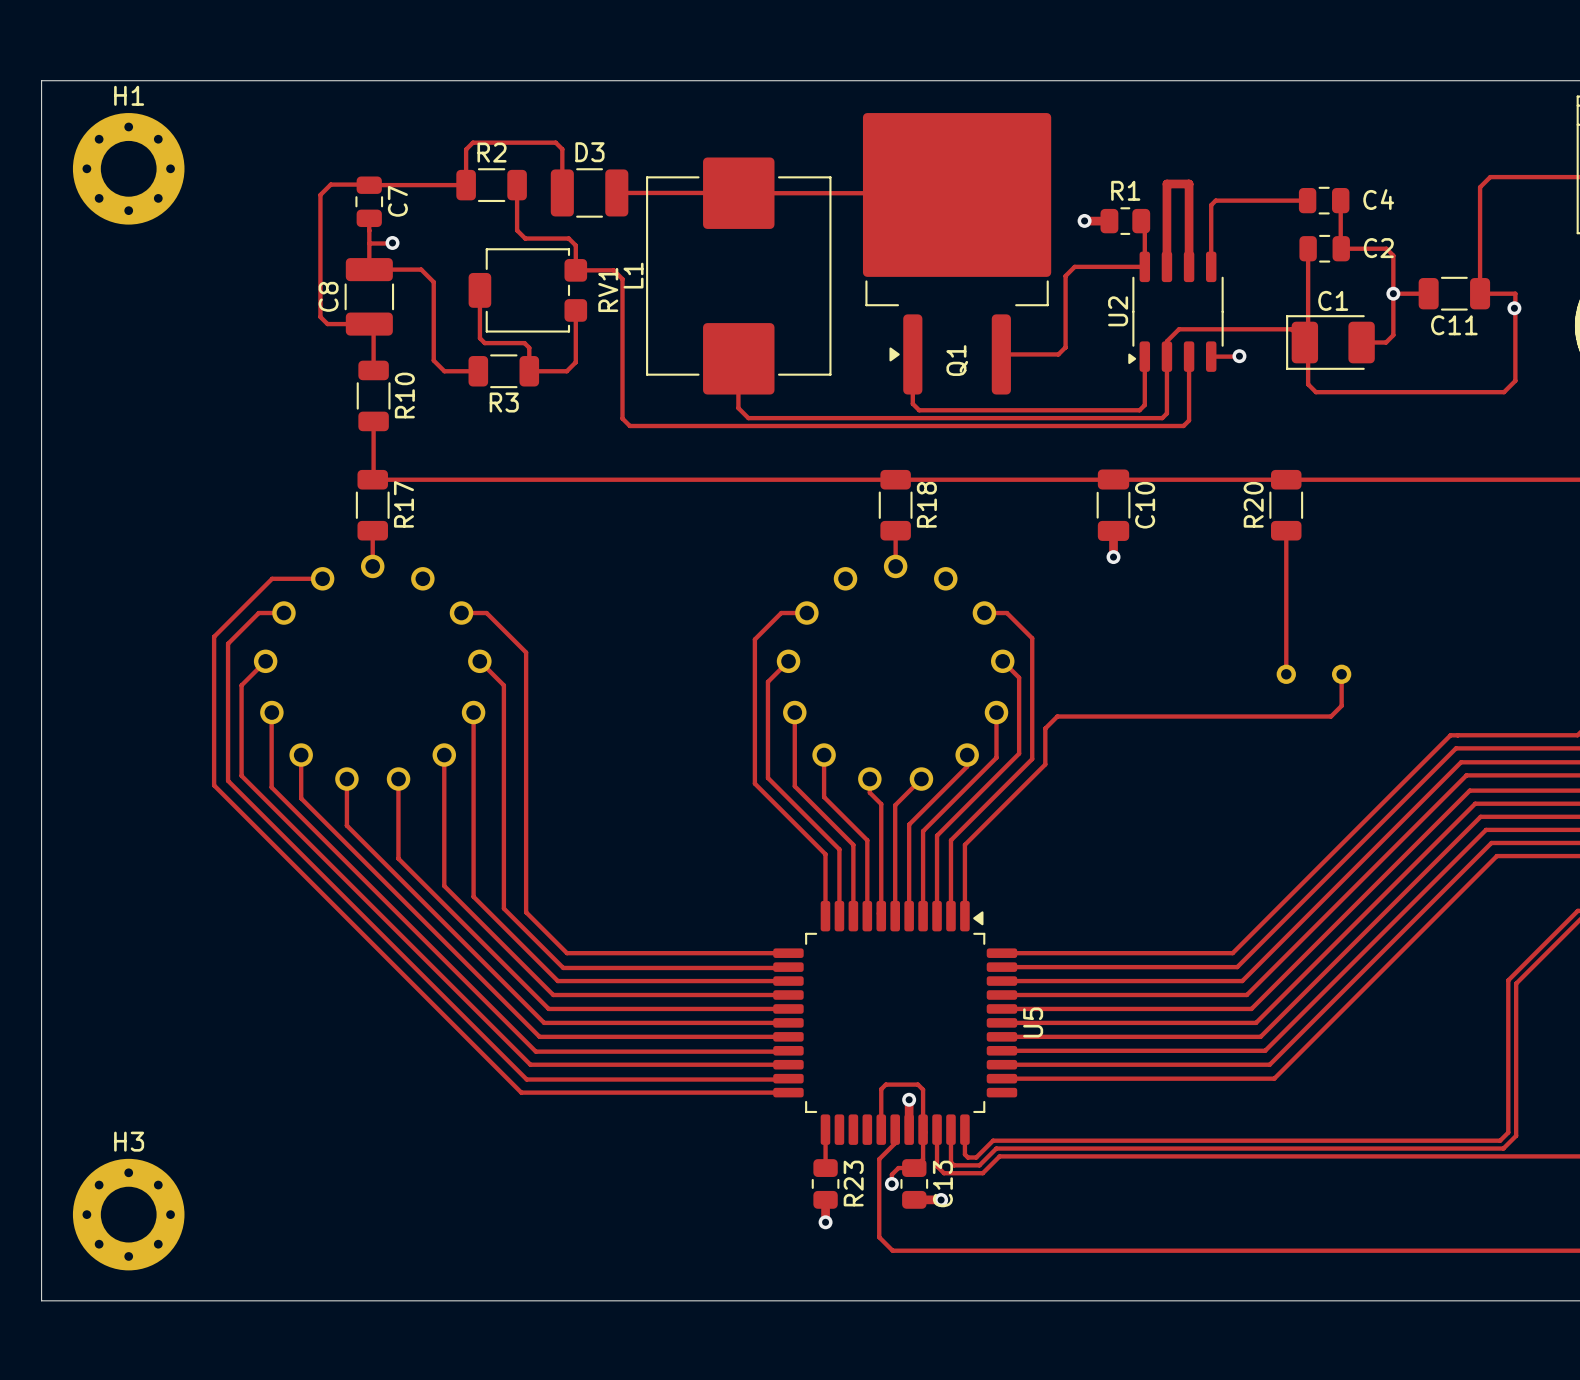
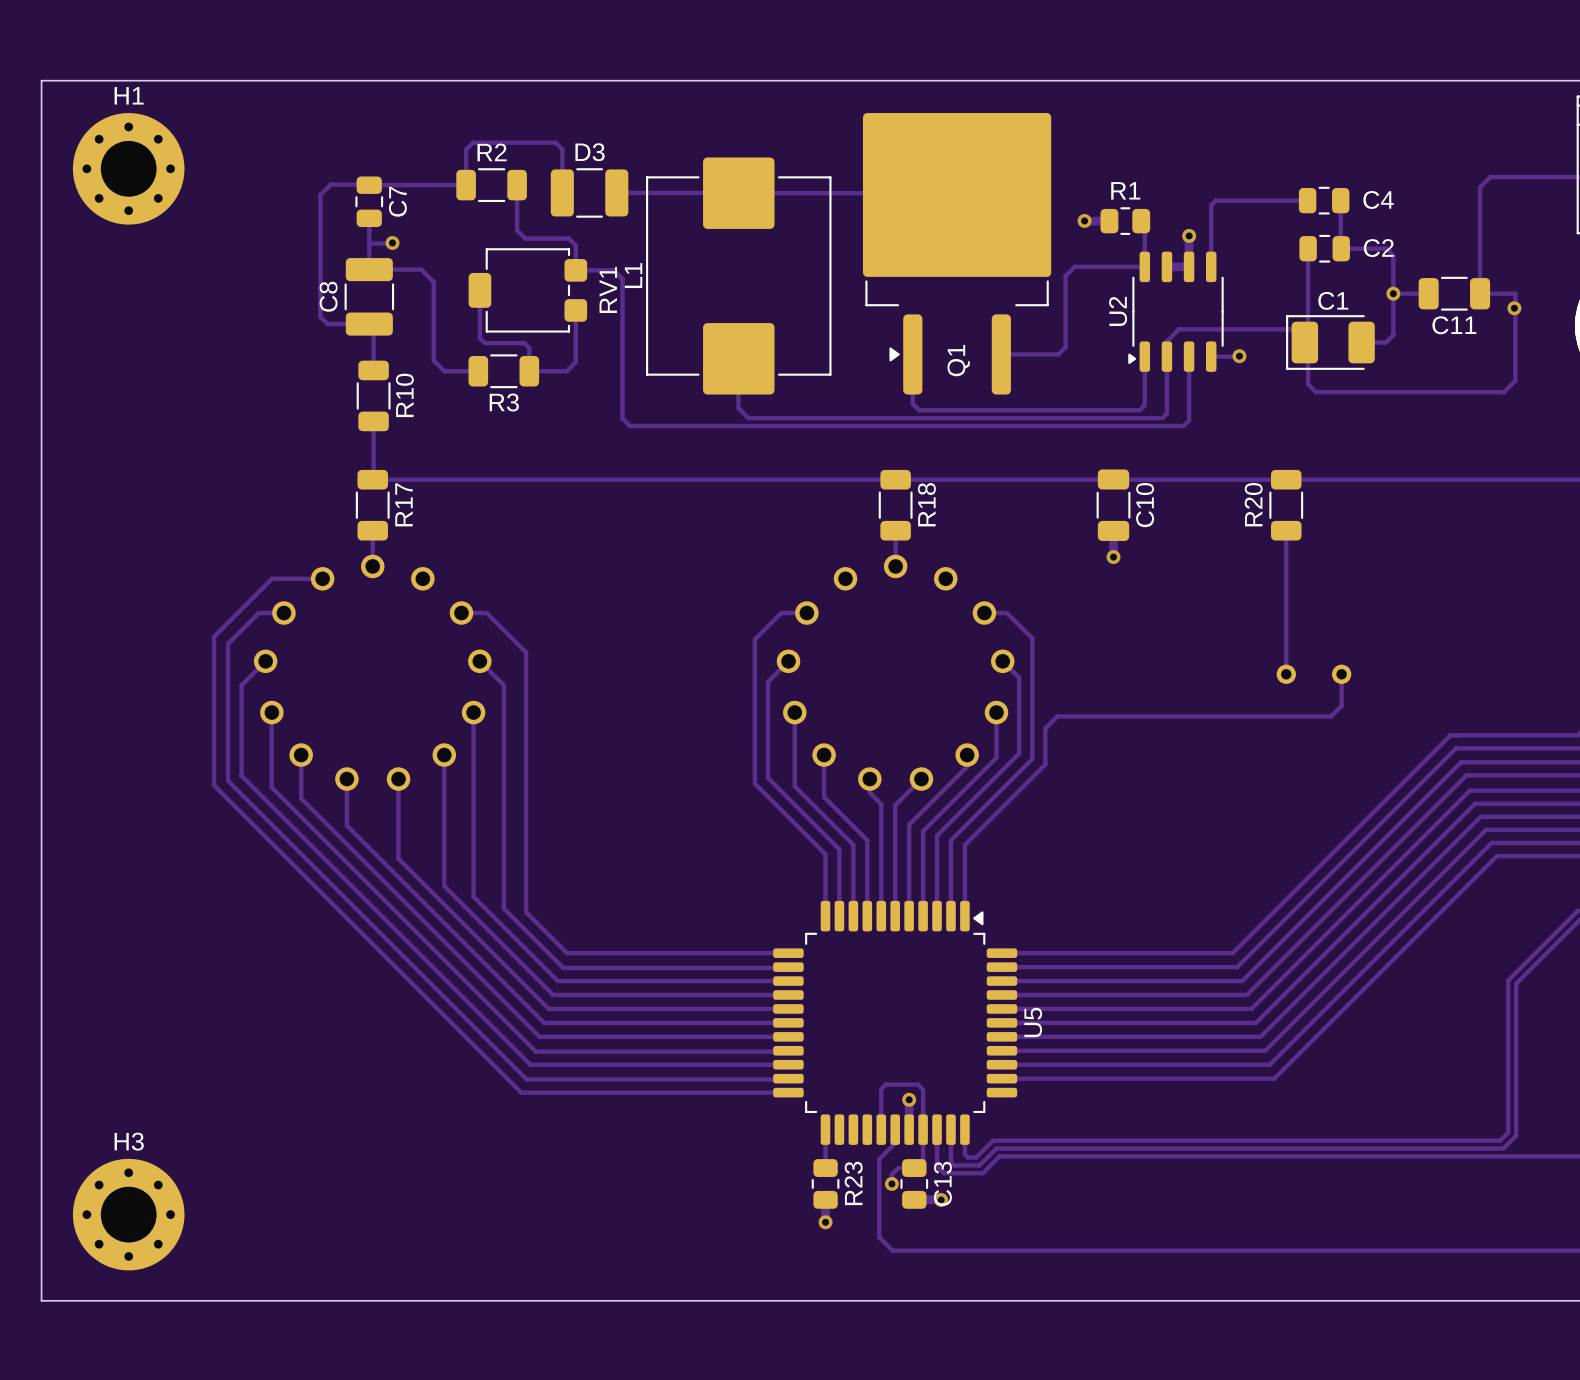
track: (1188, 183) (1166, 183) (1166, 266) -> (1189, 266) (1166, 266)
track: (1189, 184) (1189, 236) -> none
via: none -> (1189, 235)

